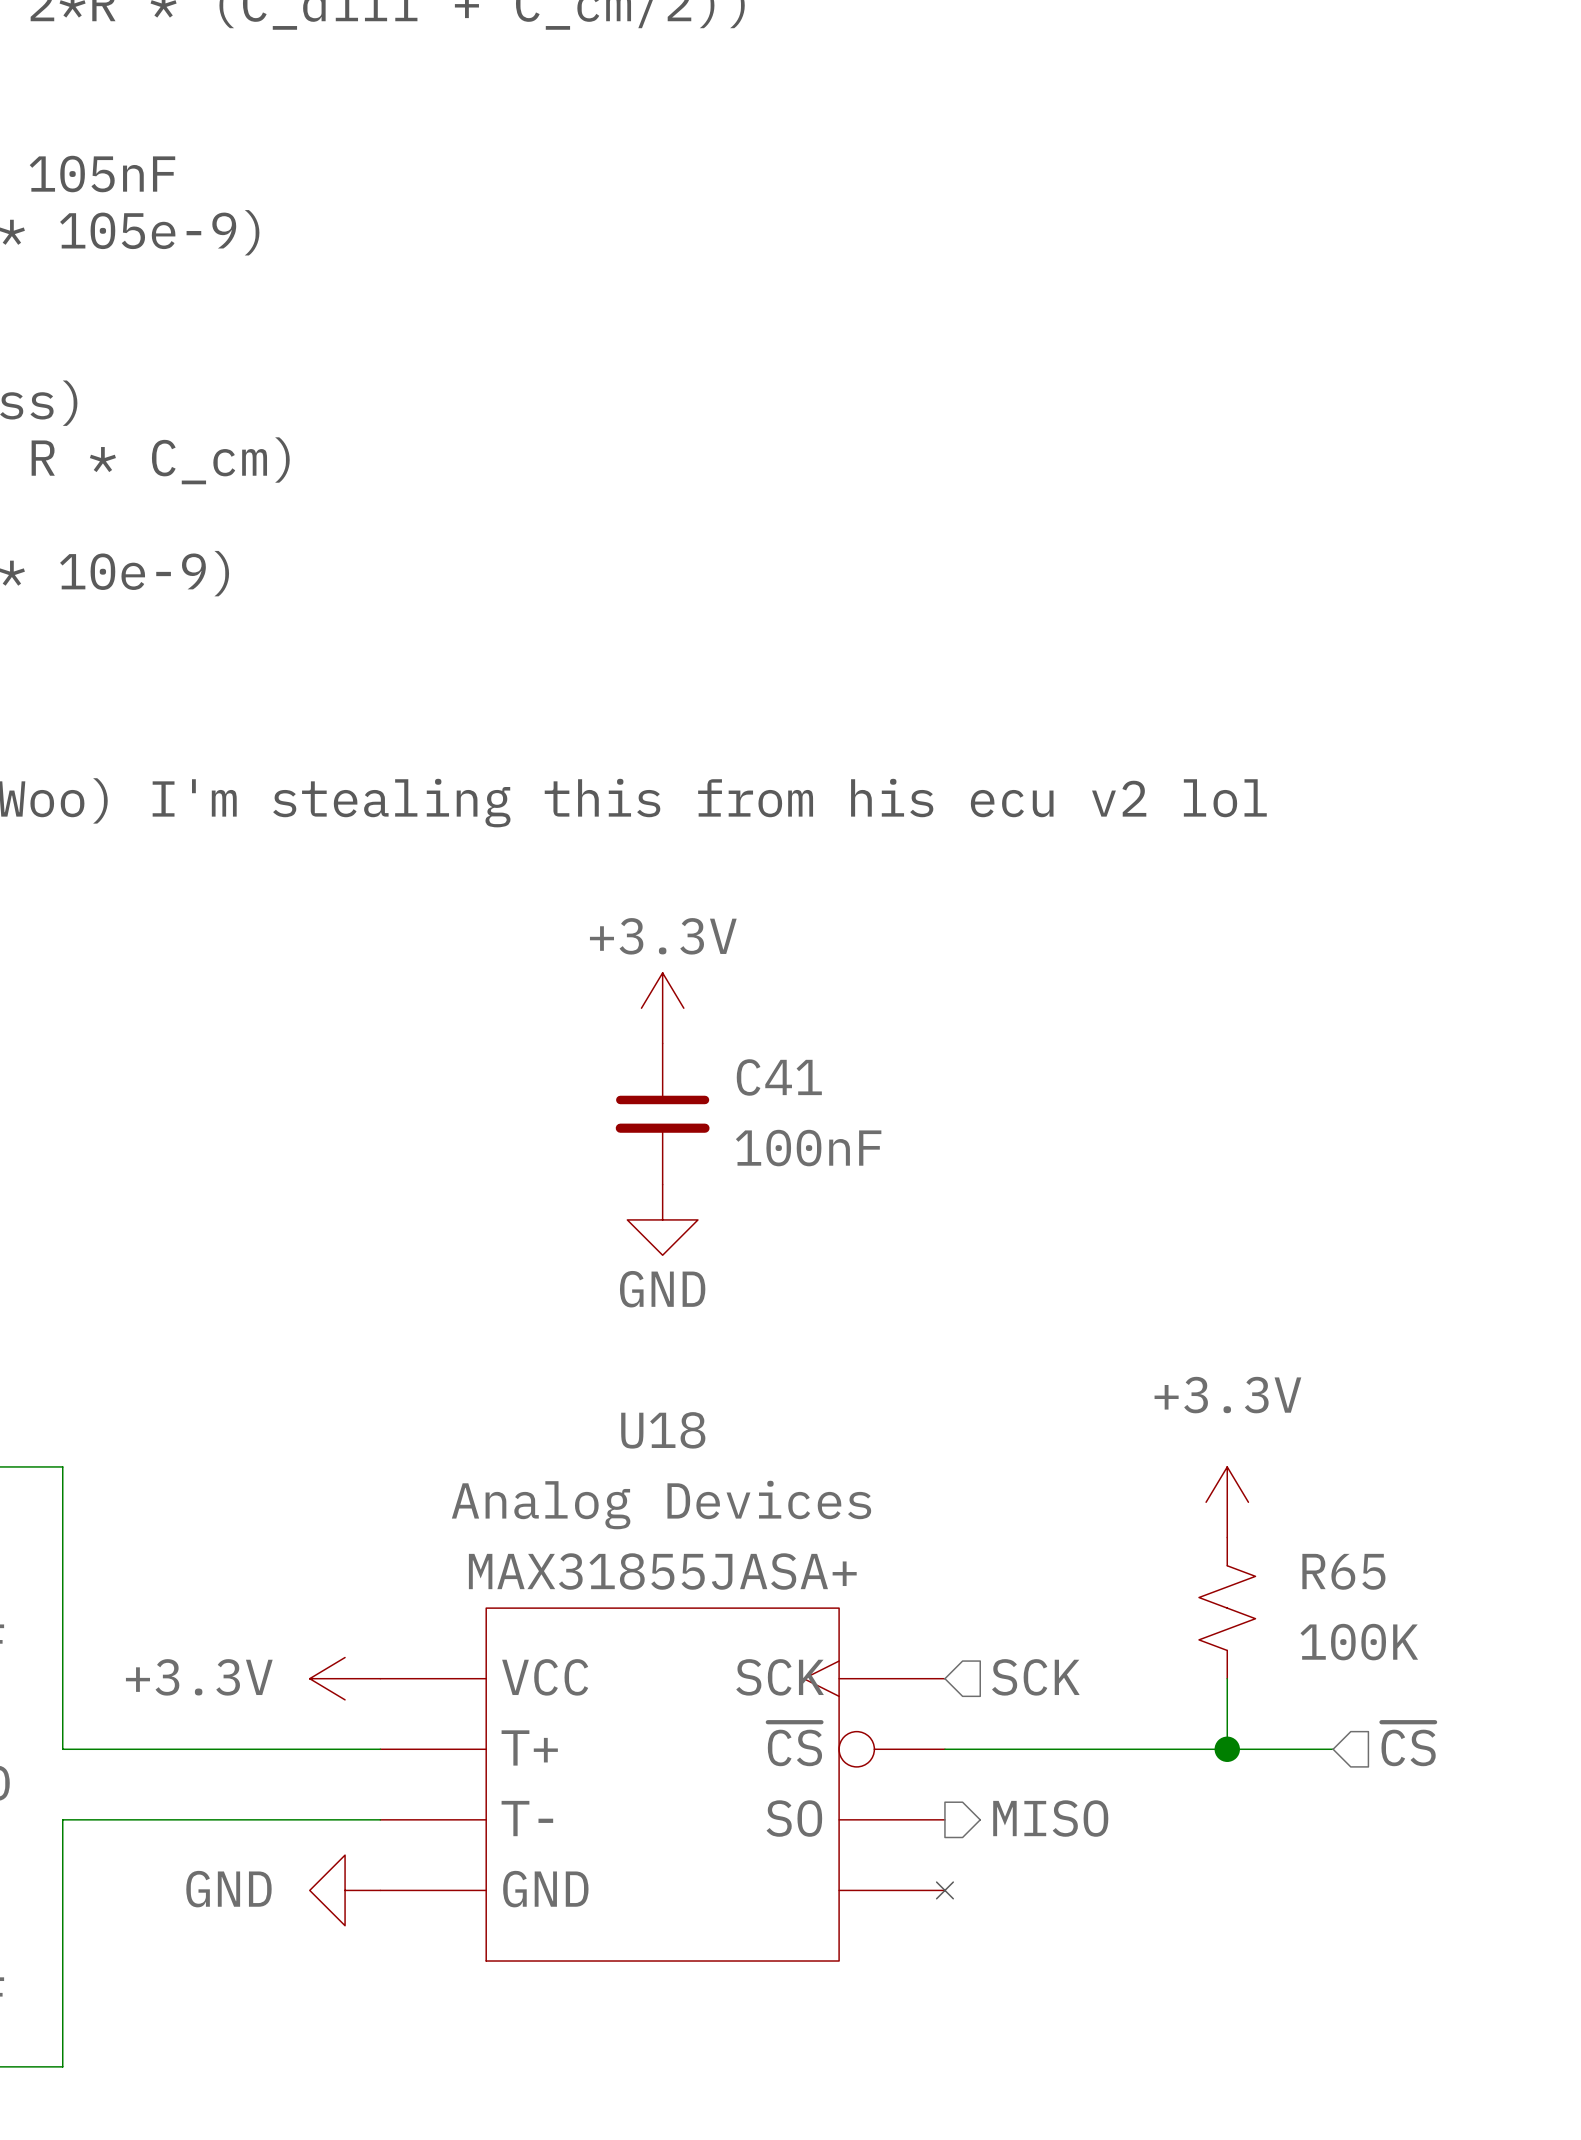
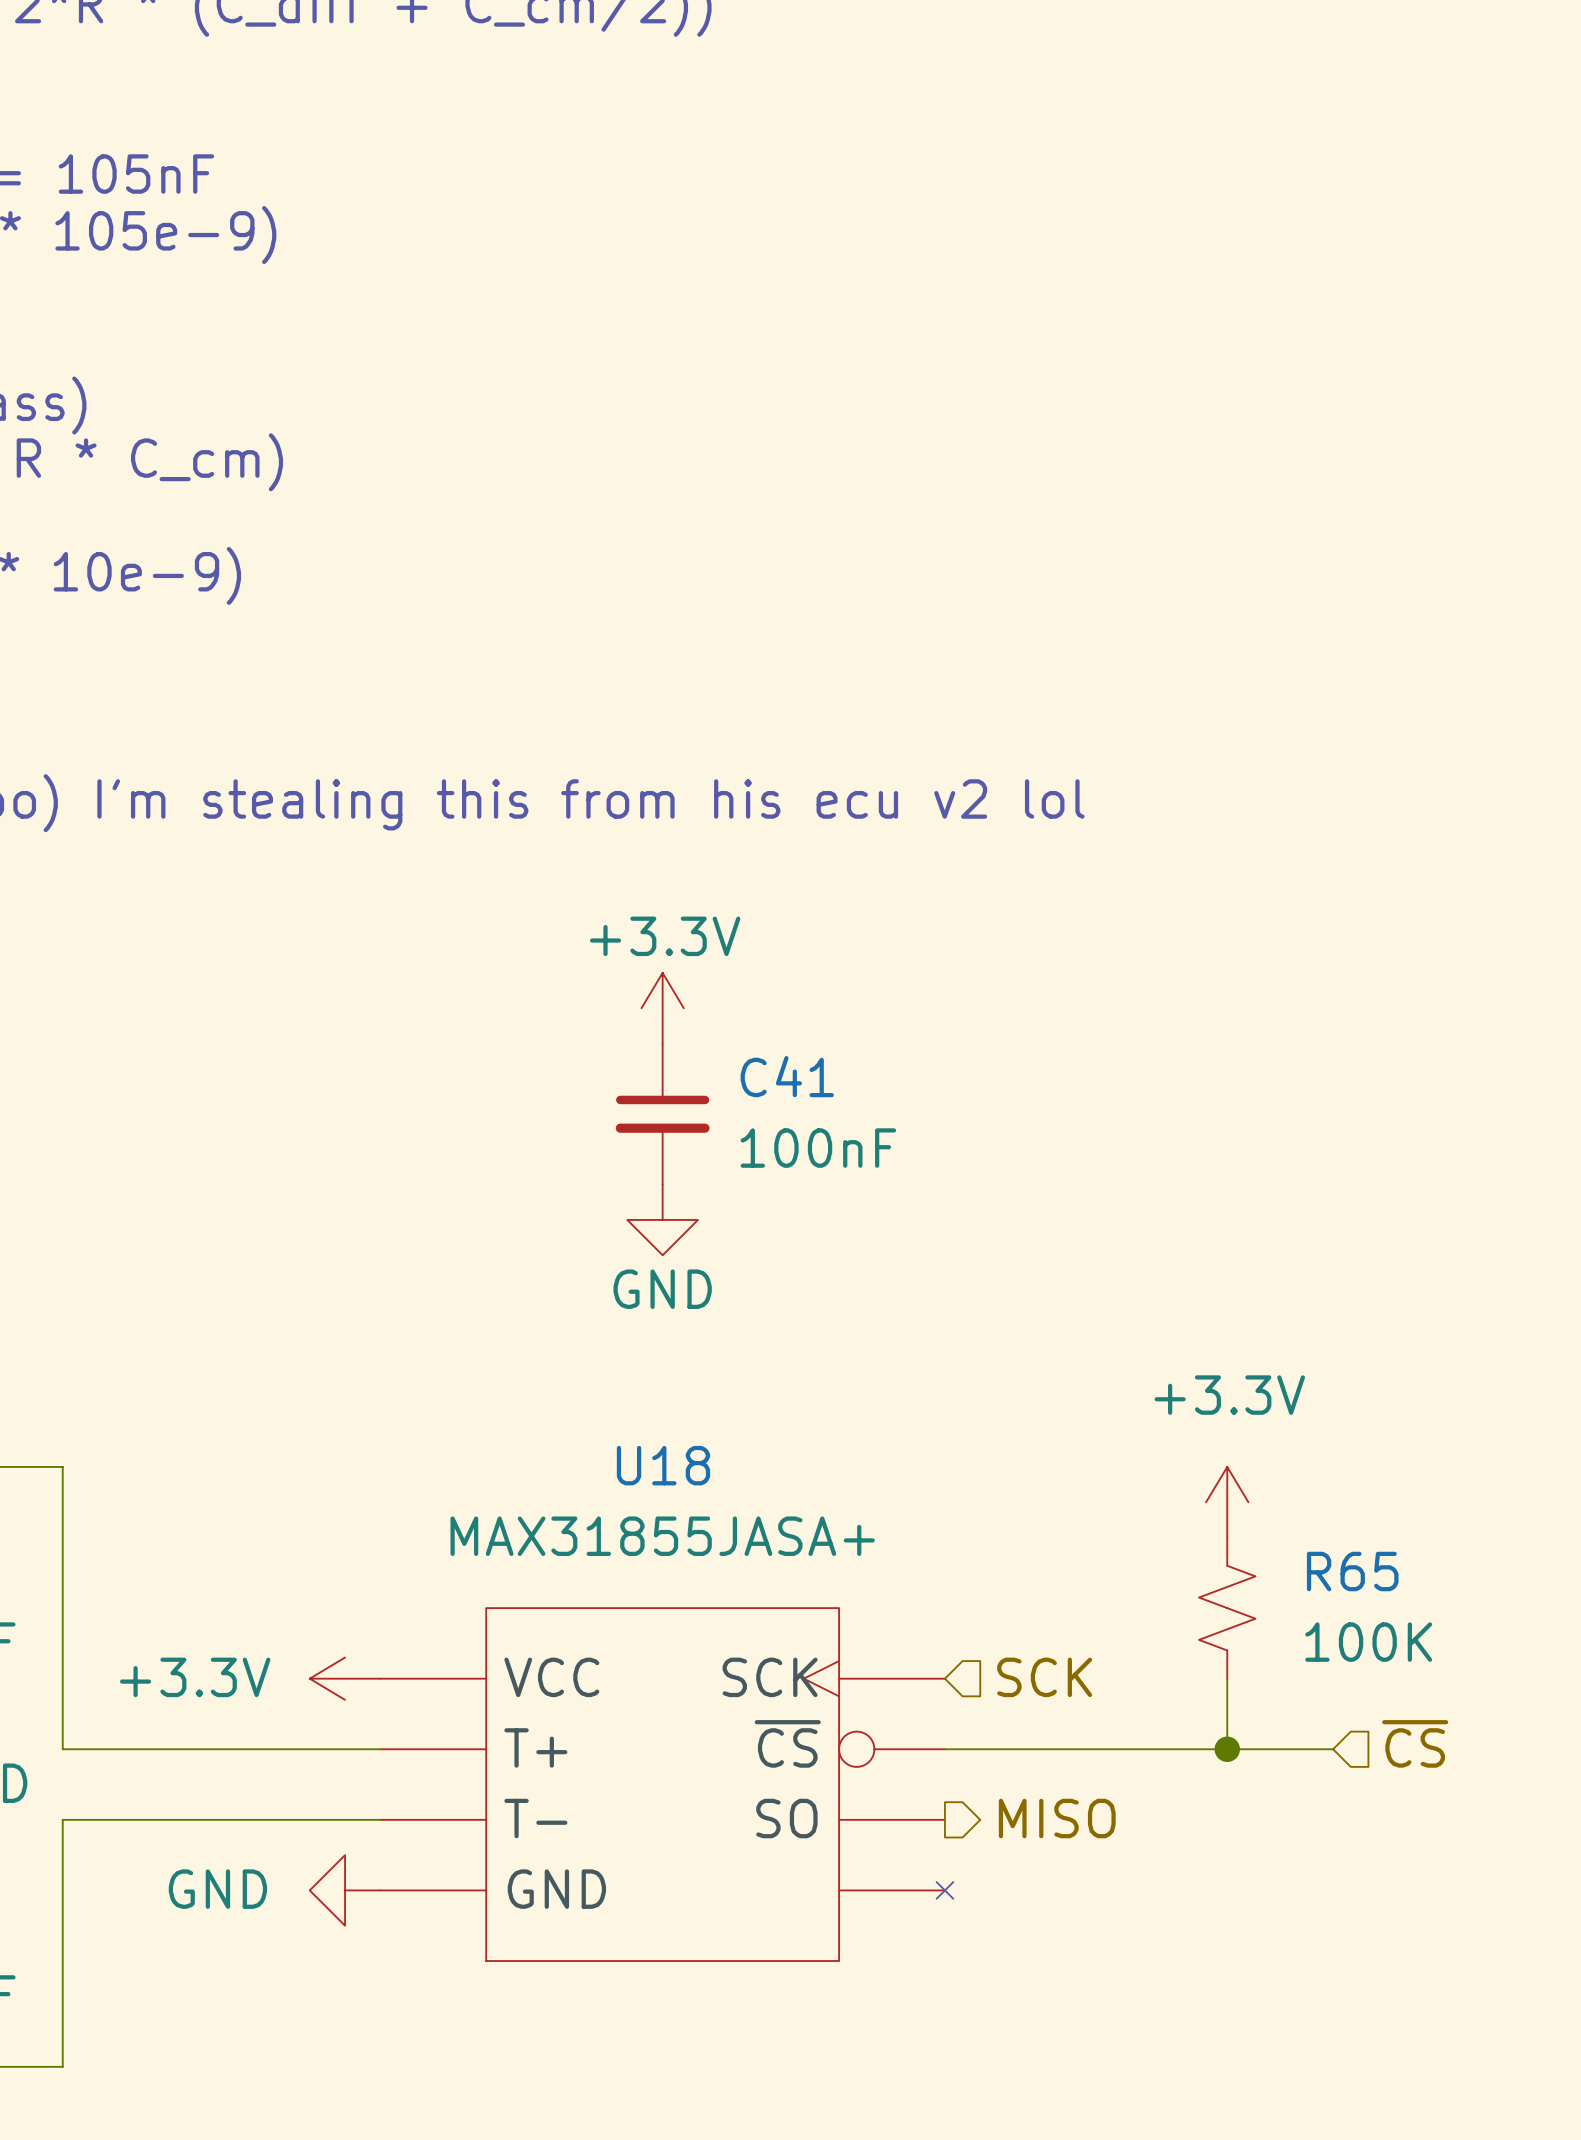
U18 name position: U18 (663, 1430) -> U18 (663, 1465)
U18 text: Analog Devices (661, 1505) -> none
U18 text position: MAX31855JASA+ (662, 1571) -> MAX31855JASA+ (662, 1536)

